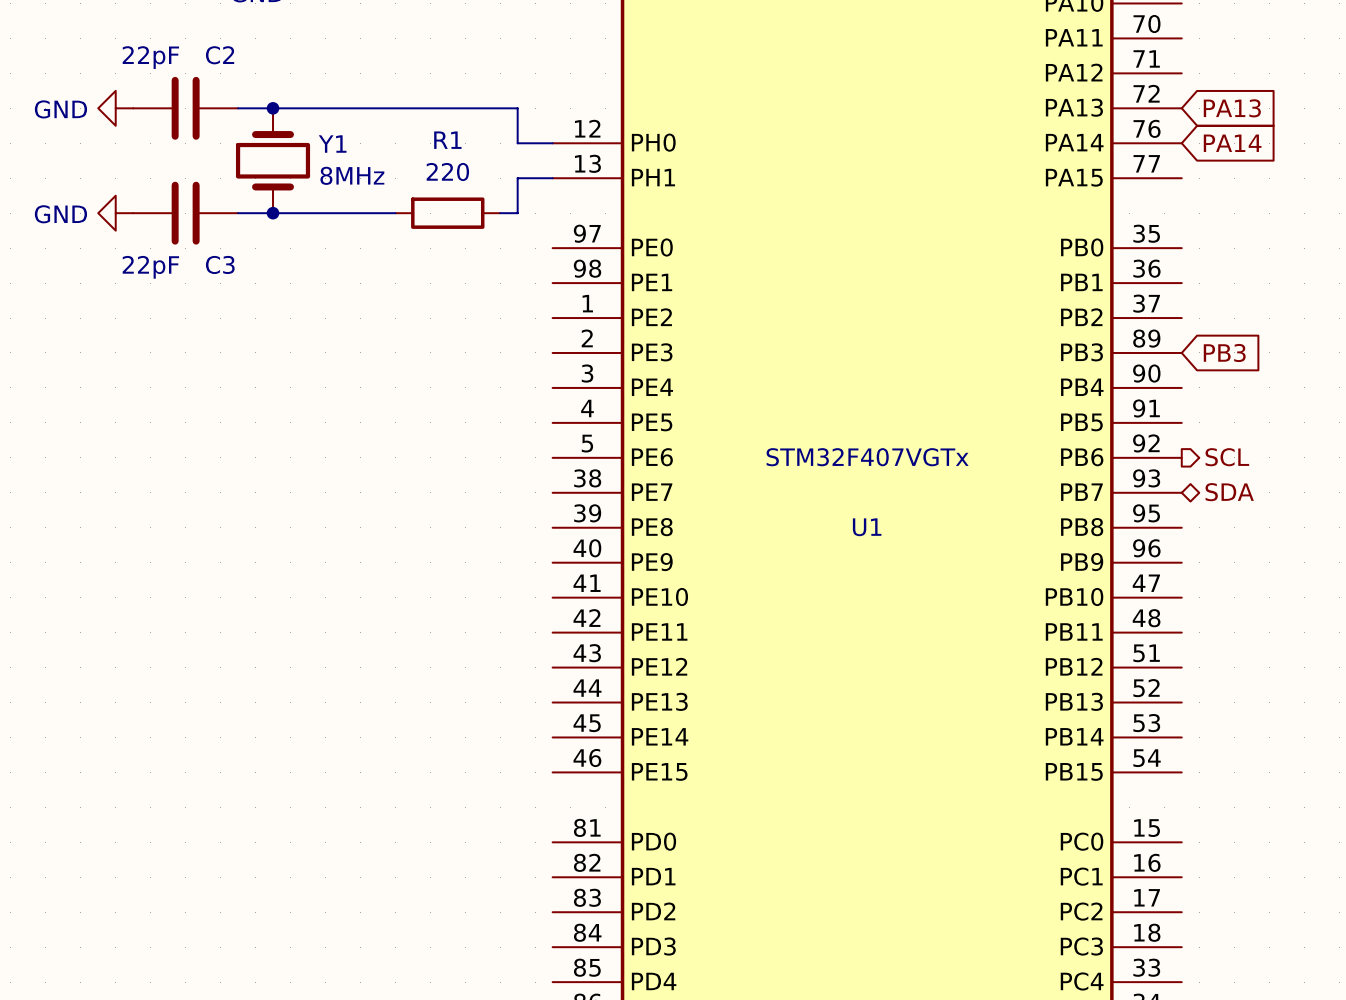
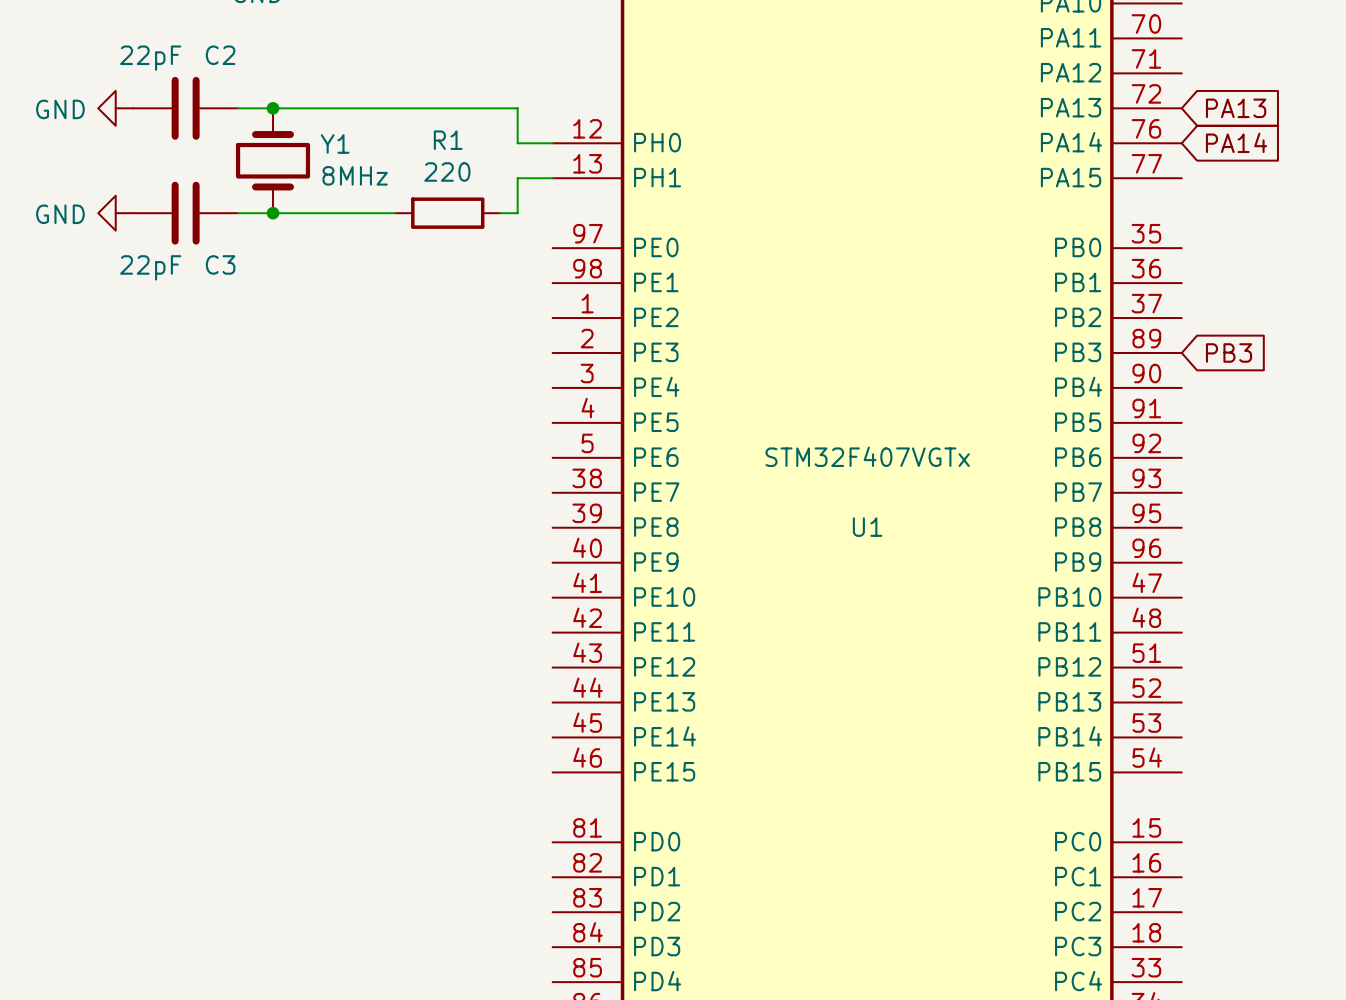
hierarchical label: SCL (1227, 457) -> none
hierarchical label: SDA (1229, 492) -> none

